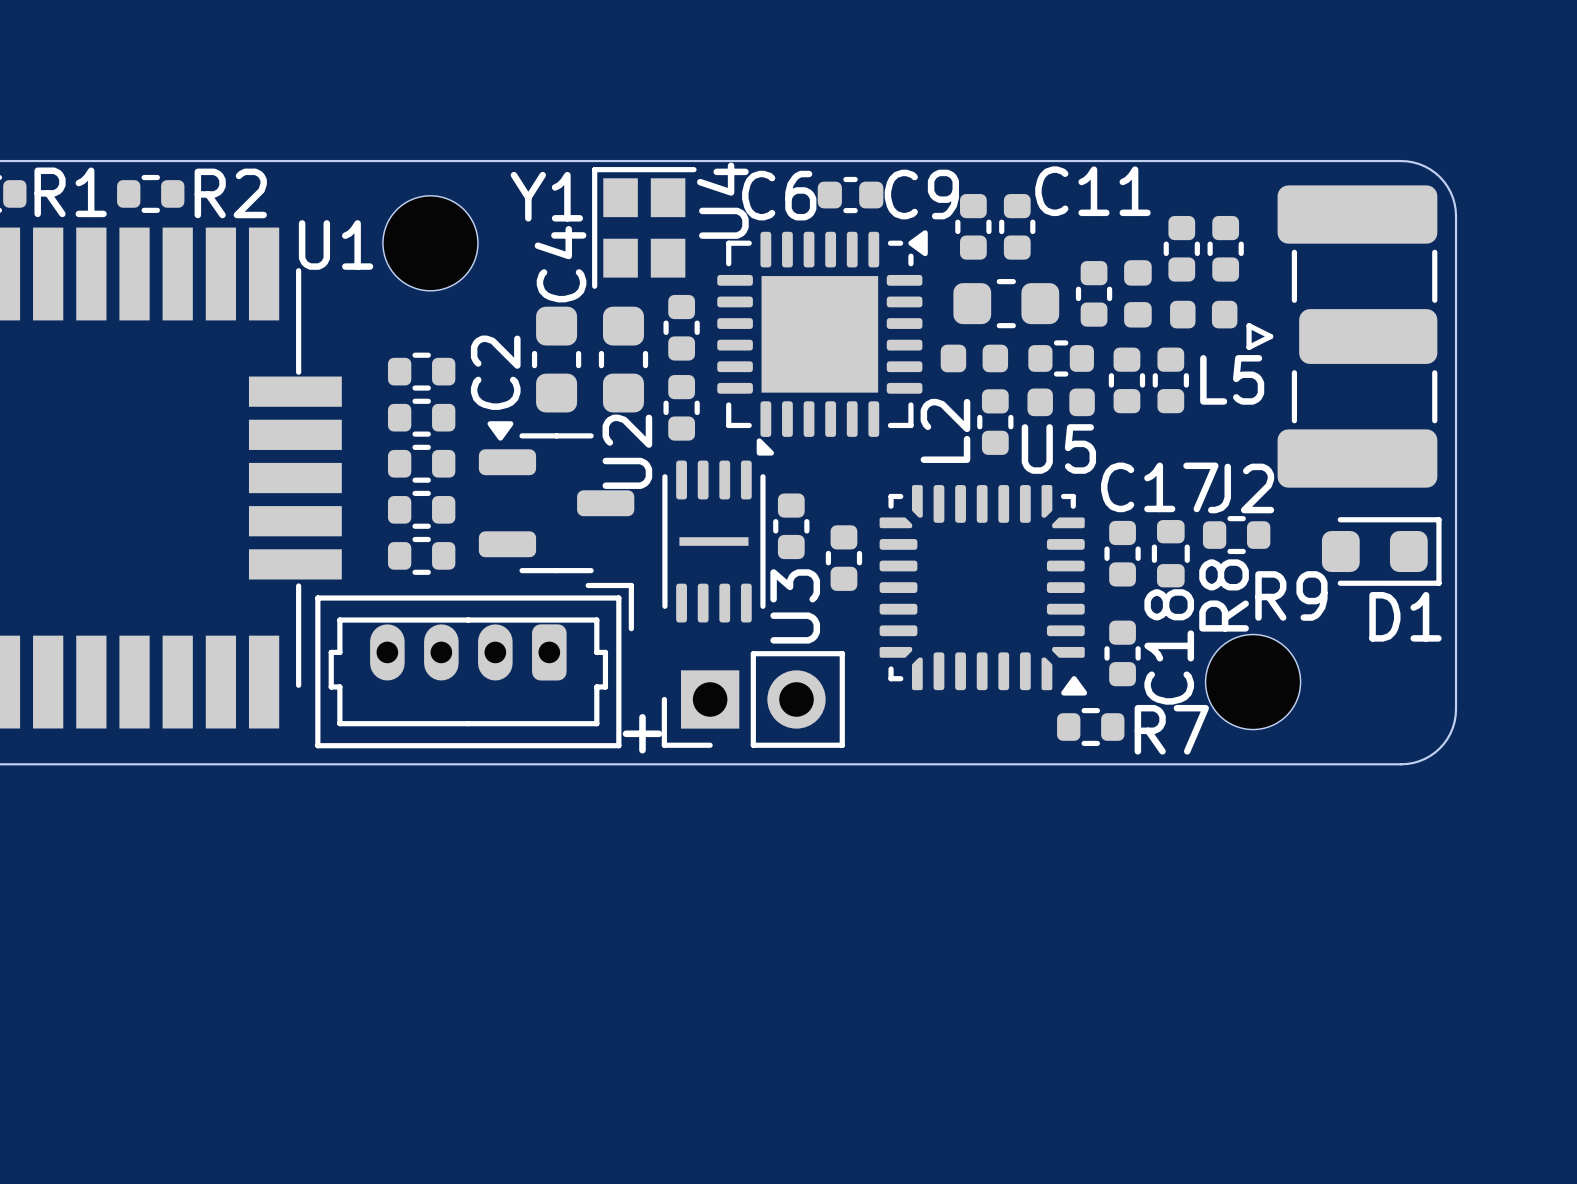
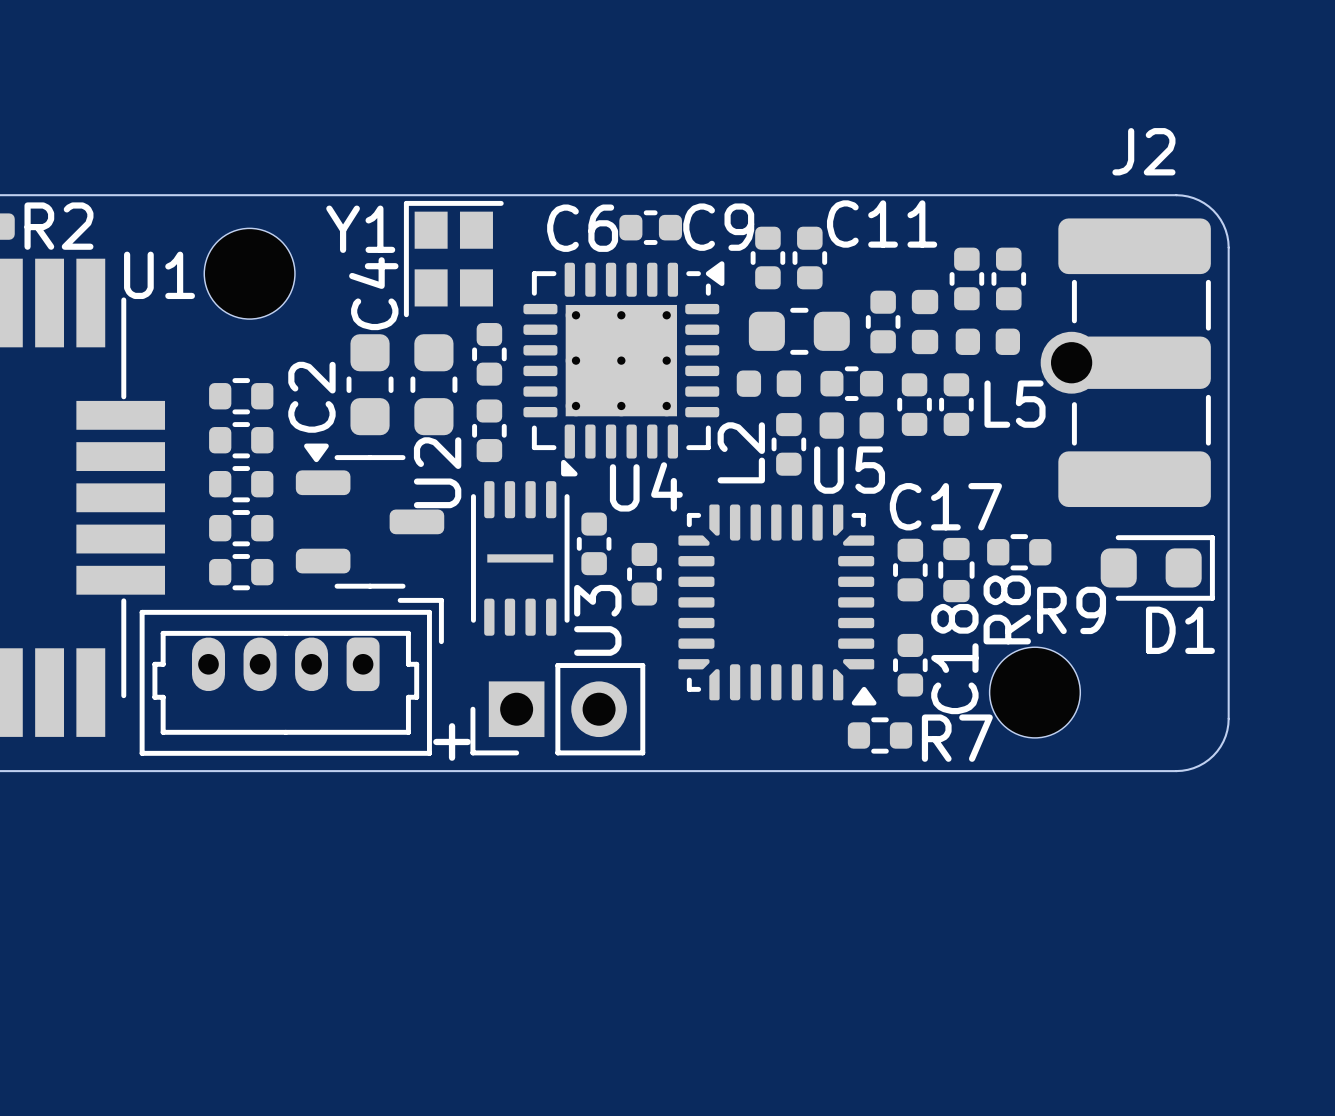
J2 footprint: [1246, 185, 1438, 488] -> [1040, 218, 1211, 508]
U4 name position: U4 (722, 200) -> U4 (646, 486)
U4 footprint: [717, 230, 928, 437] -> [523, 261, 725, 459]
J2 name position: J2 (1241, 488) -> J2 (1143, 151)

